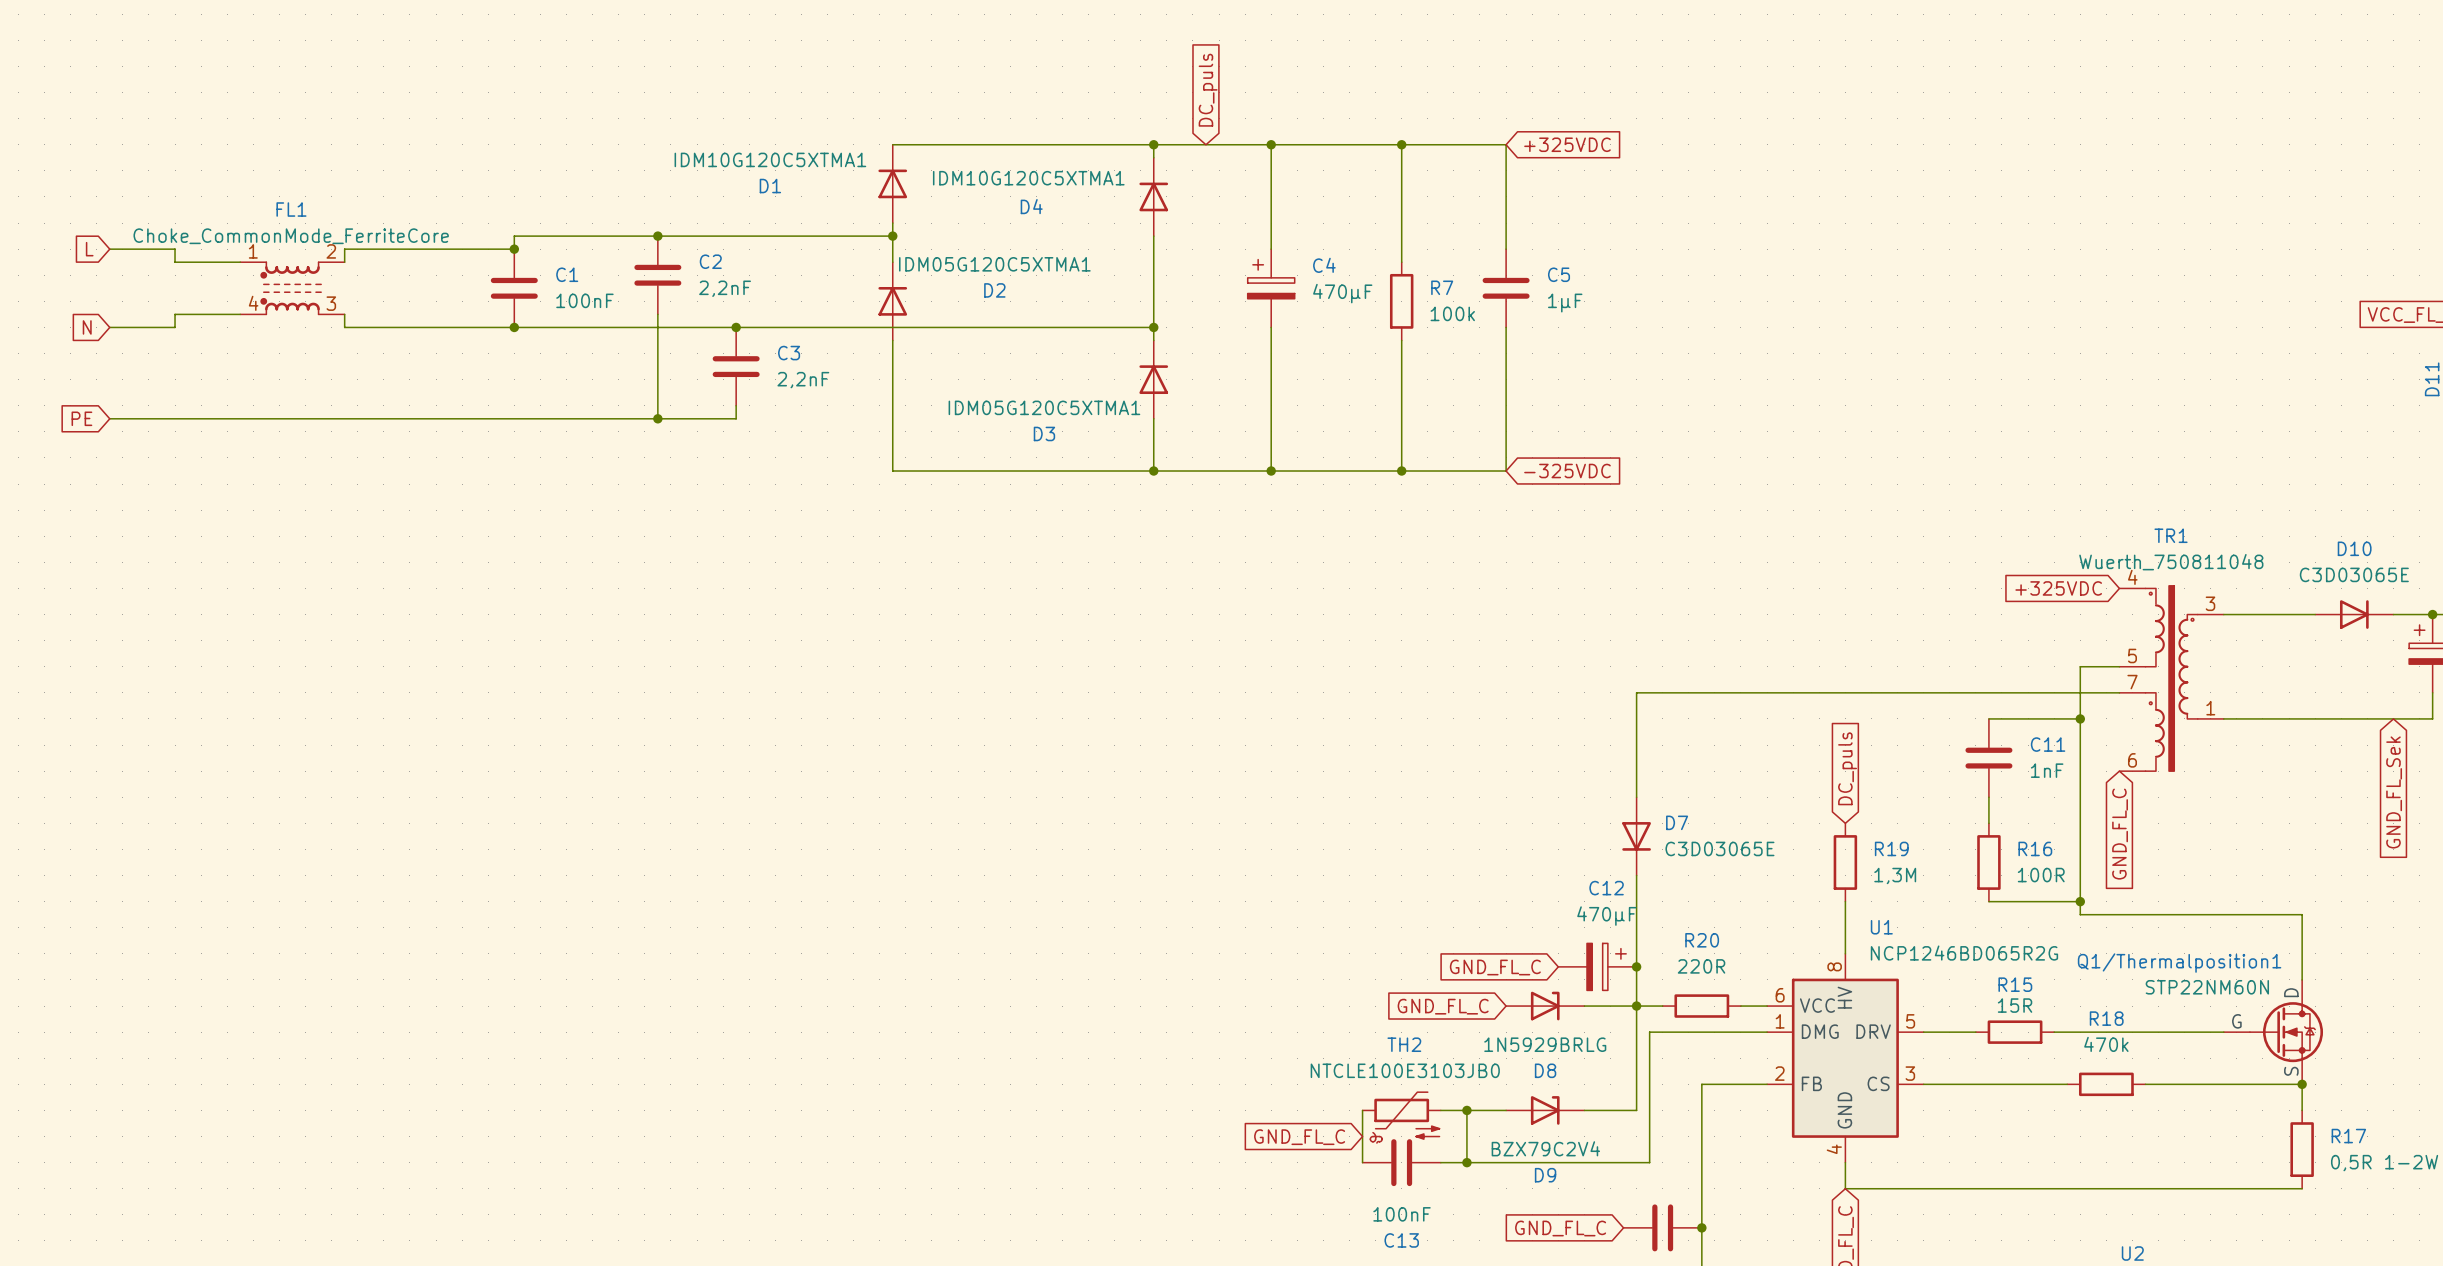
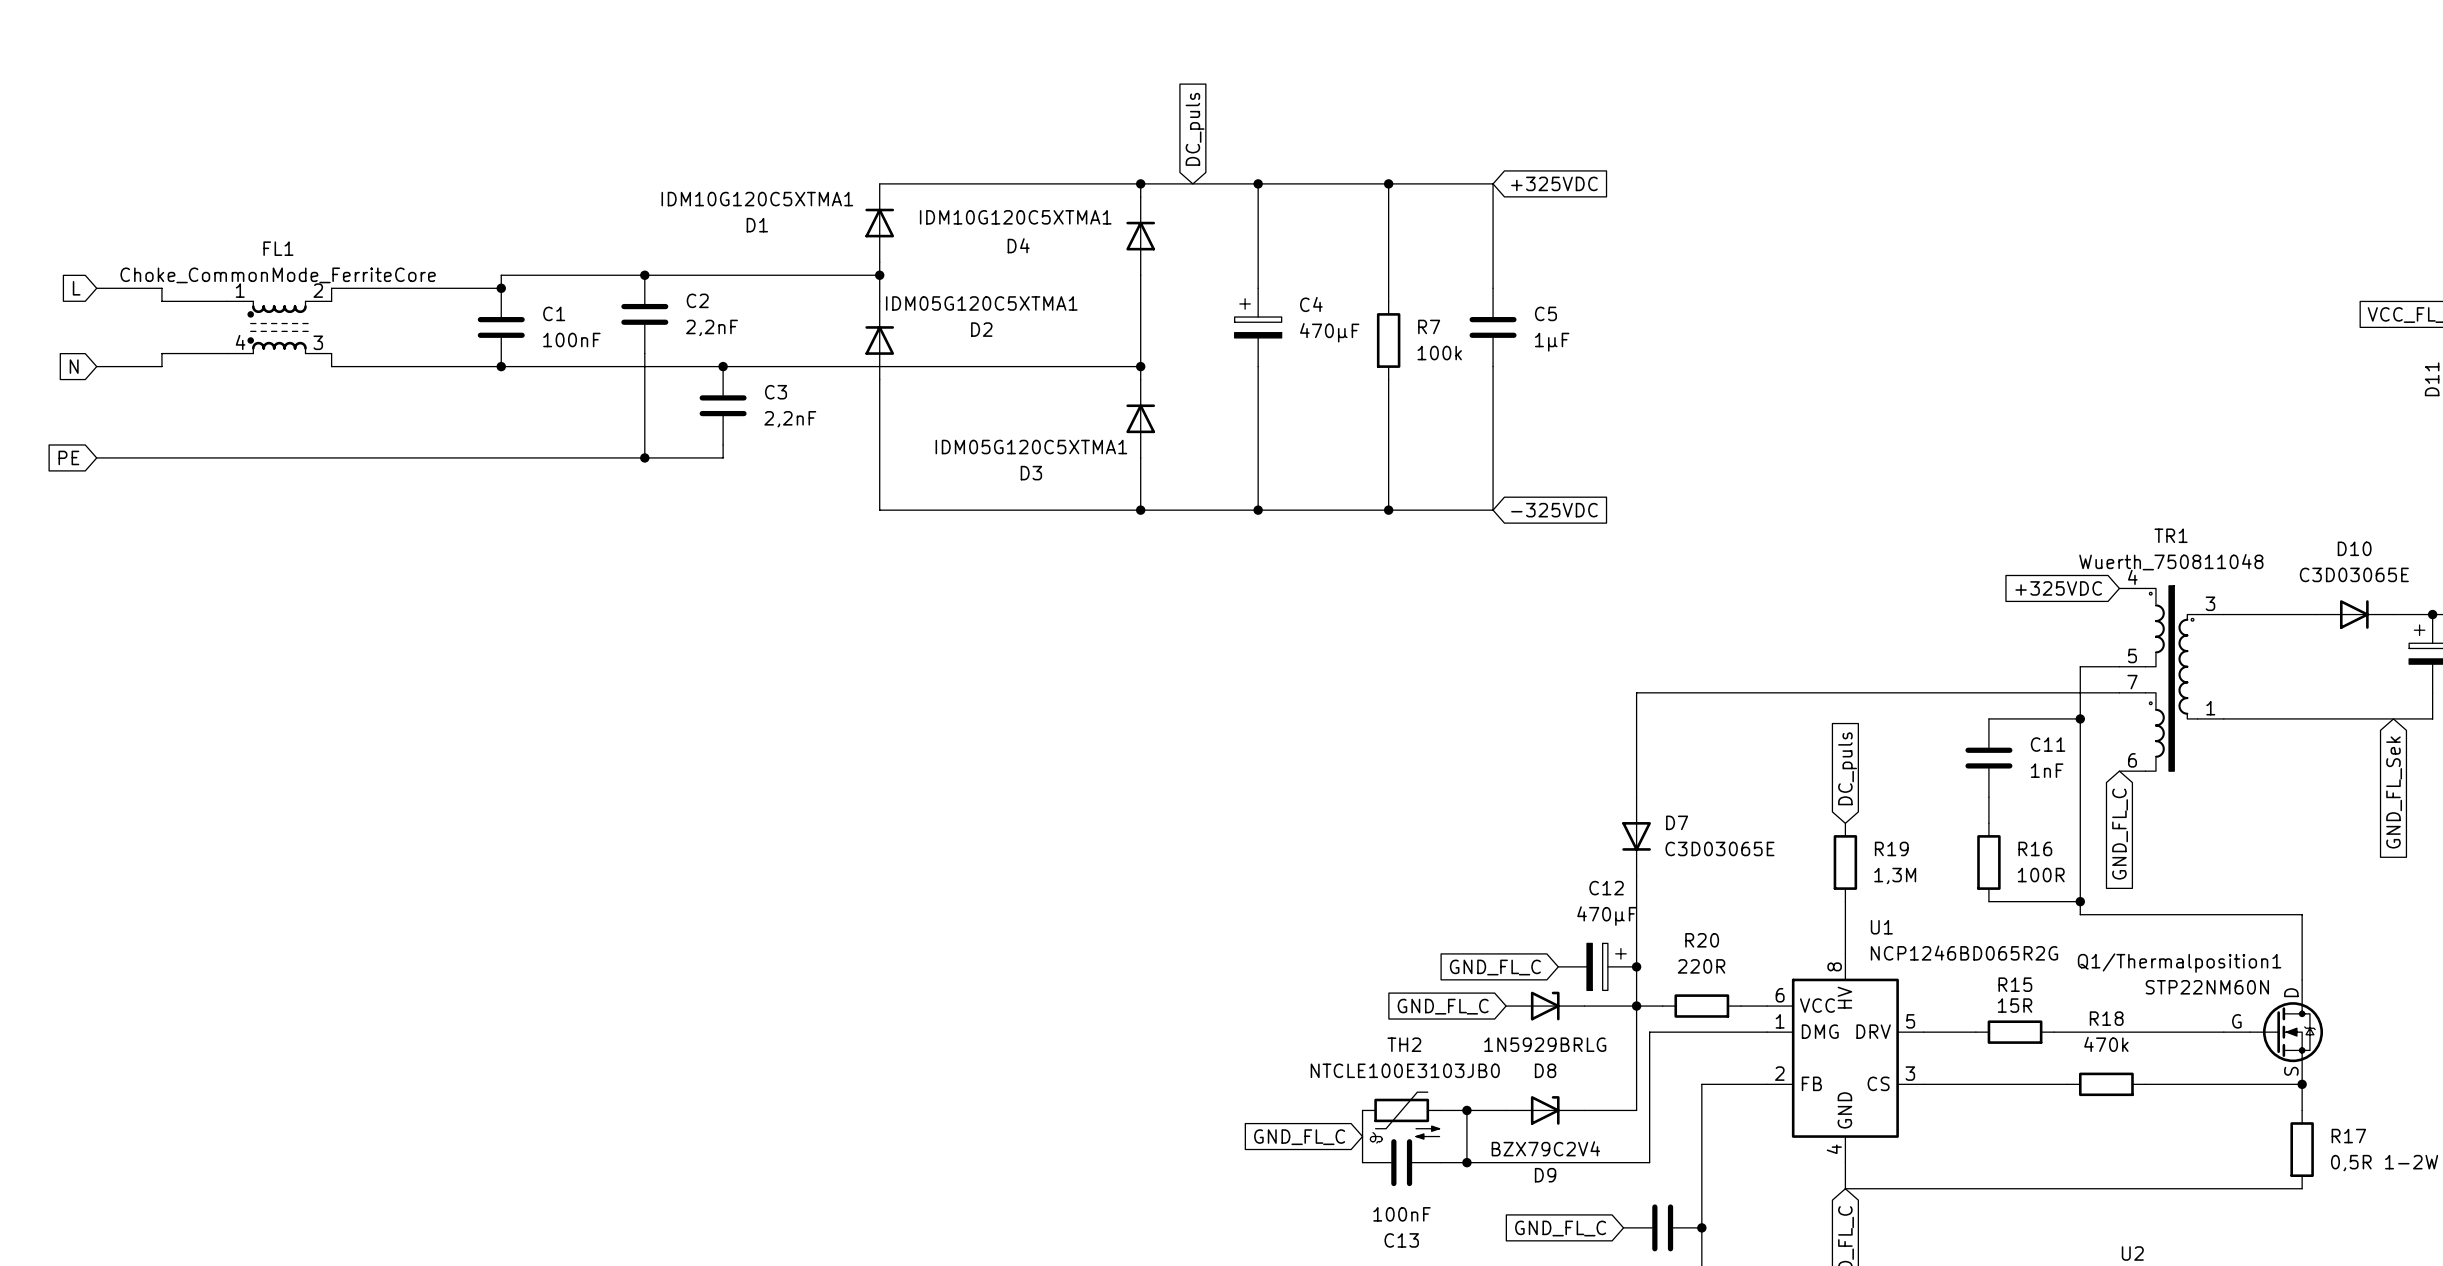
global label position: DC_puls (1208, 90) -> DC_puls (1195, 129)
wire: (892, 144) (1506, 144) (1506, 249) -> (879, 183) (1493, 183) (1493, 288)
wire: (1153, 144) (1153, 157) -> (1140, 183) (1140, 196)
junction position: (1153, 144) -> (1140, 183)
wire: (1271, 144) (1271, 249) -> (1258, 183) (1258, 288)
junction position: (1271, 144) -> (1258, 183)
wire: (1401, 144) (1401, 262) -> (1388, 183) (1388, 301)
junction position: (1401, 144) -> (1388, 183)
global label position: +325VDC (1567, 144) -> +325VDC (1554, 183)
D1 position: (892, 183) -> (879, 223)
D4 position: (1153, 196) -> (1140, 236)
wire: (892, 223) (892, 262) -> (879, 262) (879, 301)
junction position: (657, 236) -> (644, 275)
wire: (892, 236) (514, 236) (514, 249) (344, 249) (344, 262) -> (879, 275) (501, 275) (501, 288) (331, 288) (331, 301)
junction position: (892, 236) -> (879, 275)
wire: (1153, 236) (1153, 340) -> (1140, 275) (1140, 379)
global label position: L (89, 249) -> L (76, 288)
wire: (109, 249) (175, 249) (175, 262) (240, 262) -> (96, 288) (161, 288) (161, 301) (227, 301)
junction: (514, 249) -> none
C2 position: (657, 275) -> (644, 314)
FL1 position: (292, 288) -> (279, 327)
junction: none -> (501, 288)
C1 position: (514, 288) -> (501, 327)
C4 position: (1271, 288) -> (1258, 327)
C5 position: (1506, 288) -> (1493, 327)
D2 position: (892, 301) -> (879, 340)
R7 position: (1401, 301) -> (1388, 340)
wire: (240, 314) (175, 314) (175, 327) (109, 327) -> (227, 353) (161, 353) (161, 366) (96, 366)
wire: (344, 314) (344, 327) (1153, 327) -> (331, 353) (331, 366) (1140, 366)
wire: (657, 314) (657, 418) -> (644, 353) (644, 457)
global label position: N (87, 327) -> N (74, 366)
junction: (514, 327) -> none
junction position: (736, 327) -> (723, 366)
junction position: (1153, 327) -> (1140, 366)
wire: (1271, 327) (1271, 471) -> (1258, 366) (1258, 510)
wire: (1506, 327) (1506, 471) (892, 471) (892, 340) -> (1493, 366) (1493, 510) (879, 510) (879, 379)
wire: (1401, 340) (1401, 471) -> (1388, 379) (1388, 510)
junction: none -> (501, 366)
C3 position: (736, 366) -> (723, 405)
D3 position: (1153, 379) -> (1140, 418)
wire: (736, 405) (736, 418) (109, 418) -> (723, 444) (723, 457) (96, 457)
global label position: PE (81, 418) -> PE (68, 457)
junction position: (657, 418) -> (644, 457)
wire: (1153, 418) (1153, 471) -> (1140, 457) (1140, 510)
junction position: (1153, 471) -> (1140, 510)
junction position: (1271, 471) -> (1258, 510)
junction position: (1401, 471) -> (1388, 510)
global label position: -325VDC (1567, 471) -> -325VDC (1554, 510)

